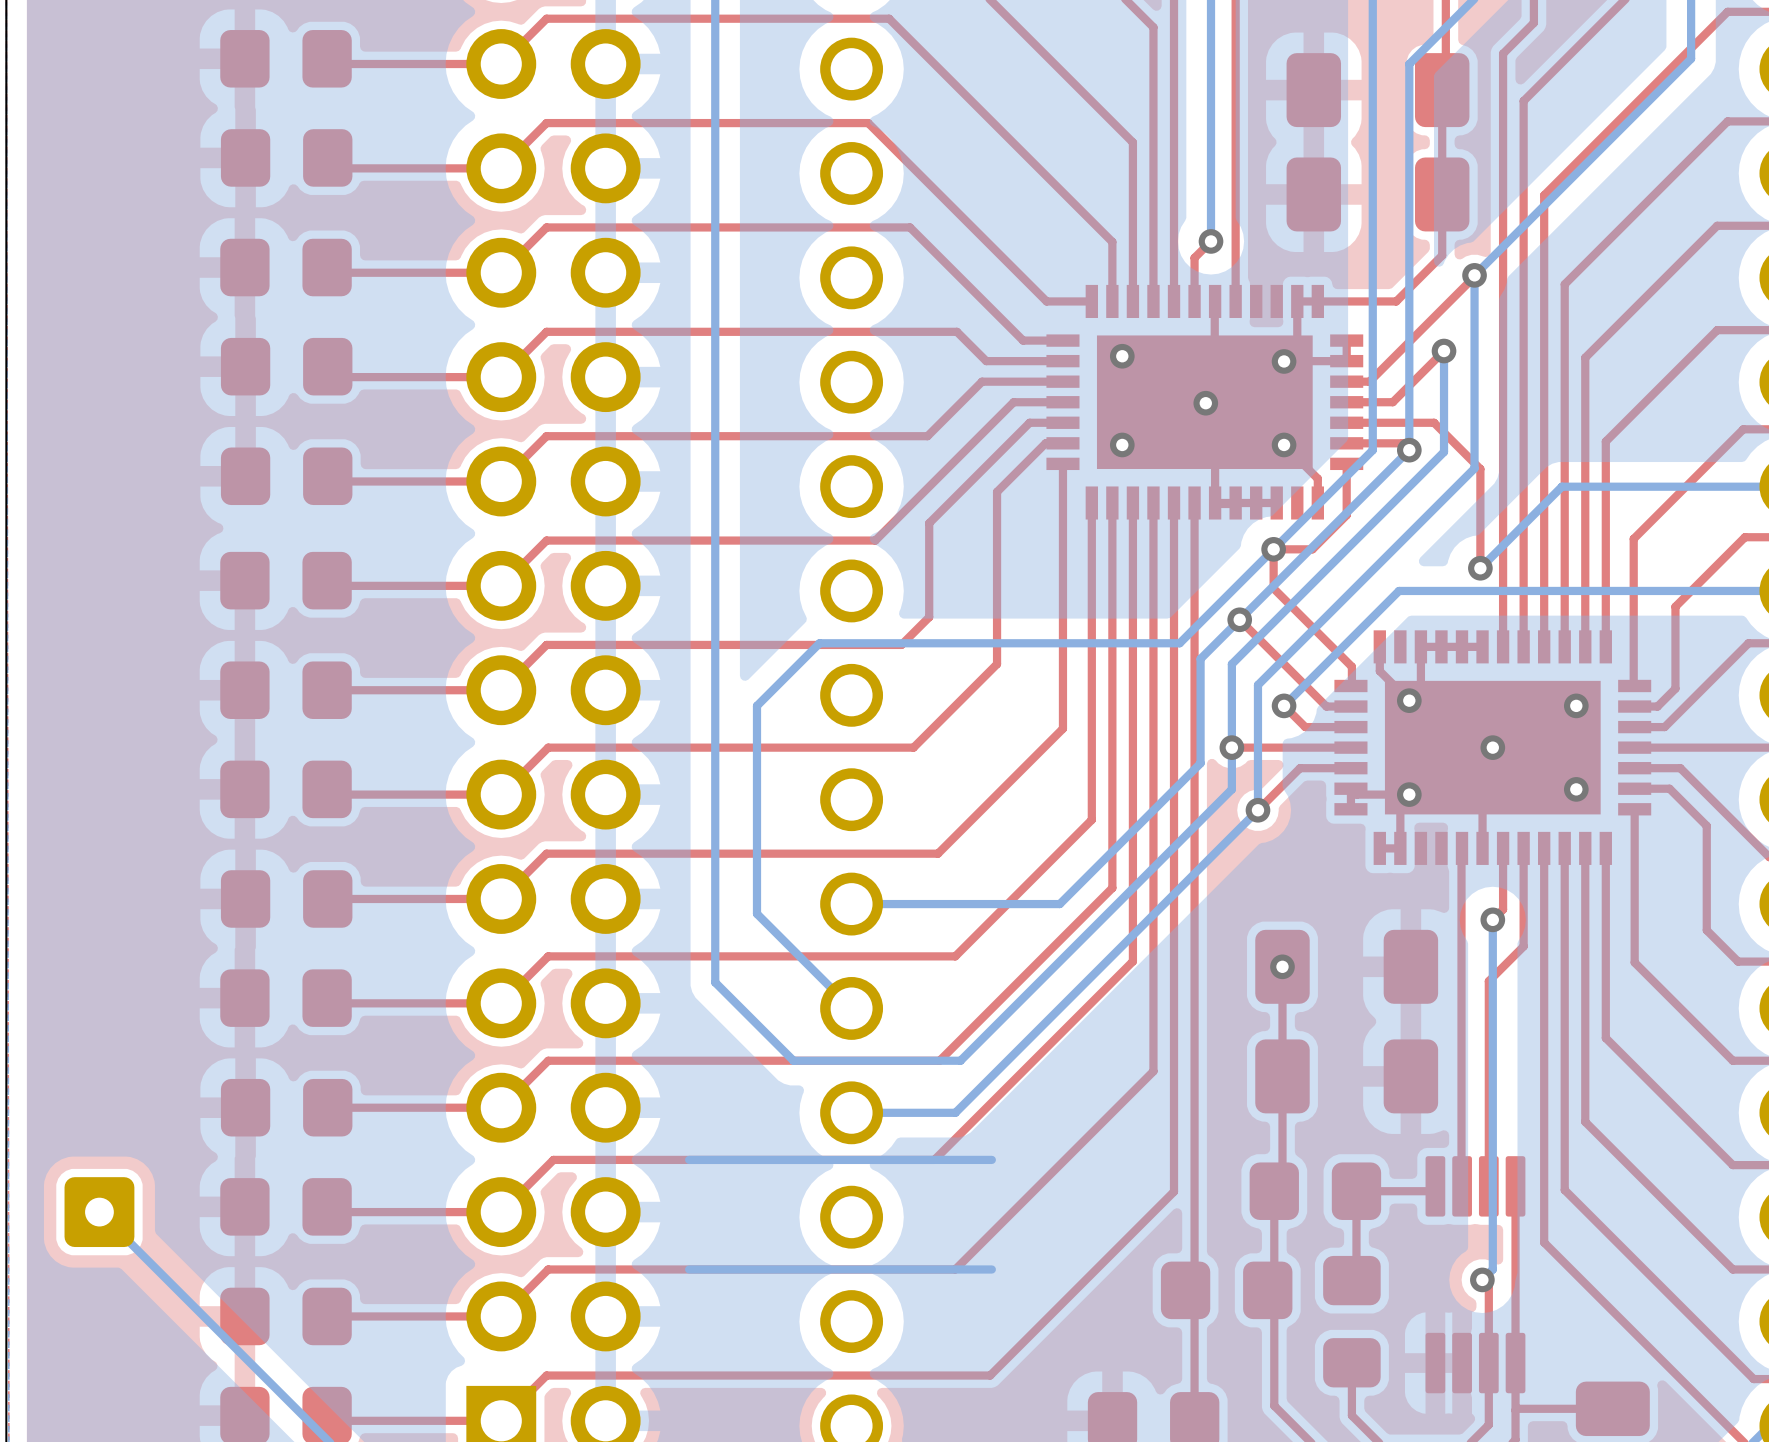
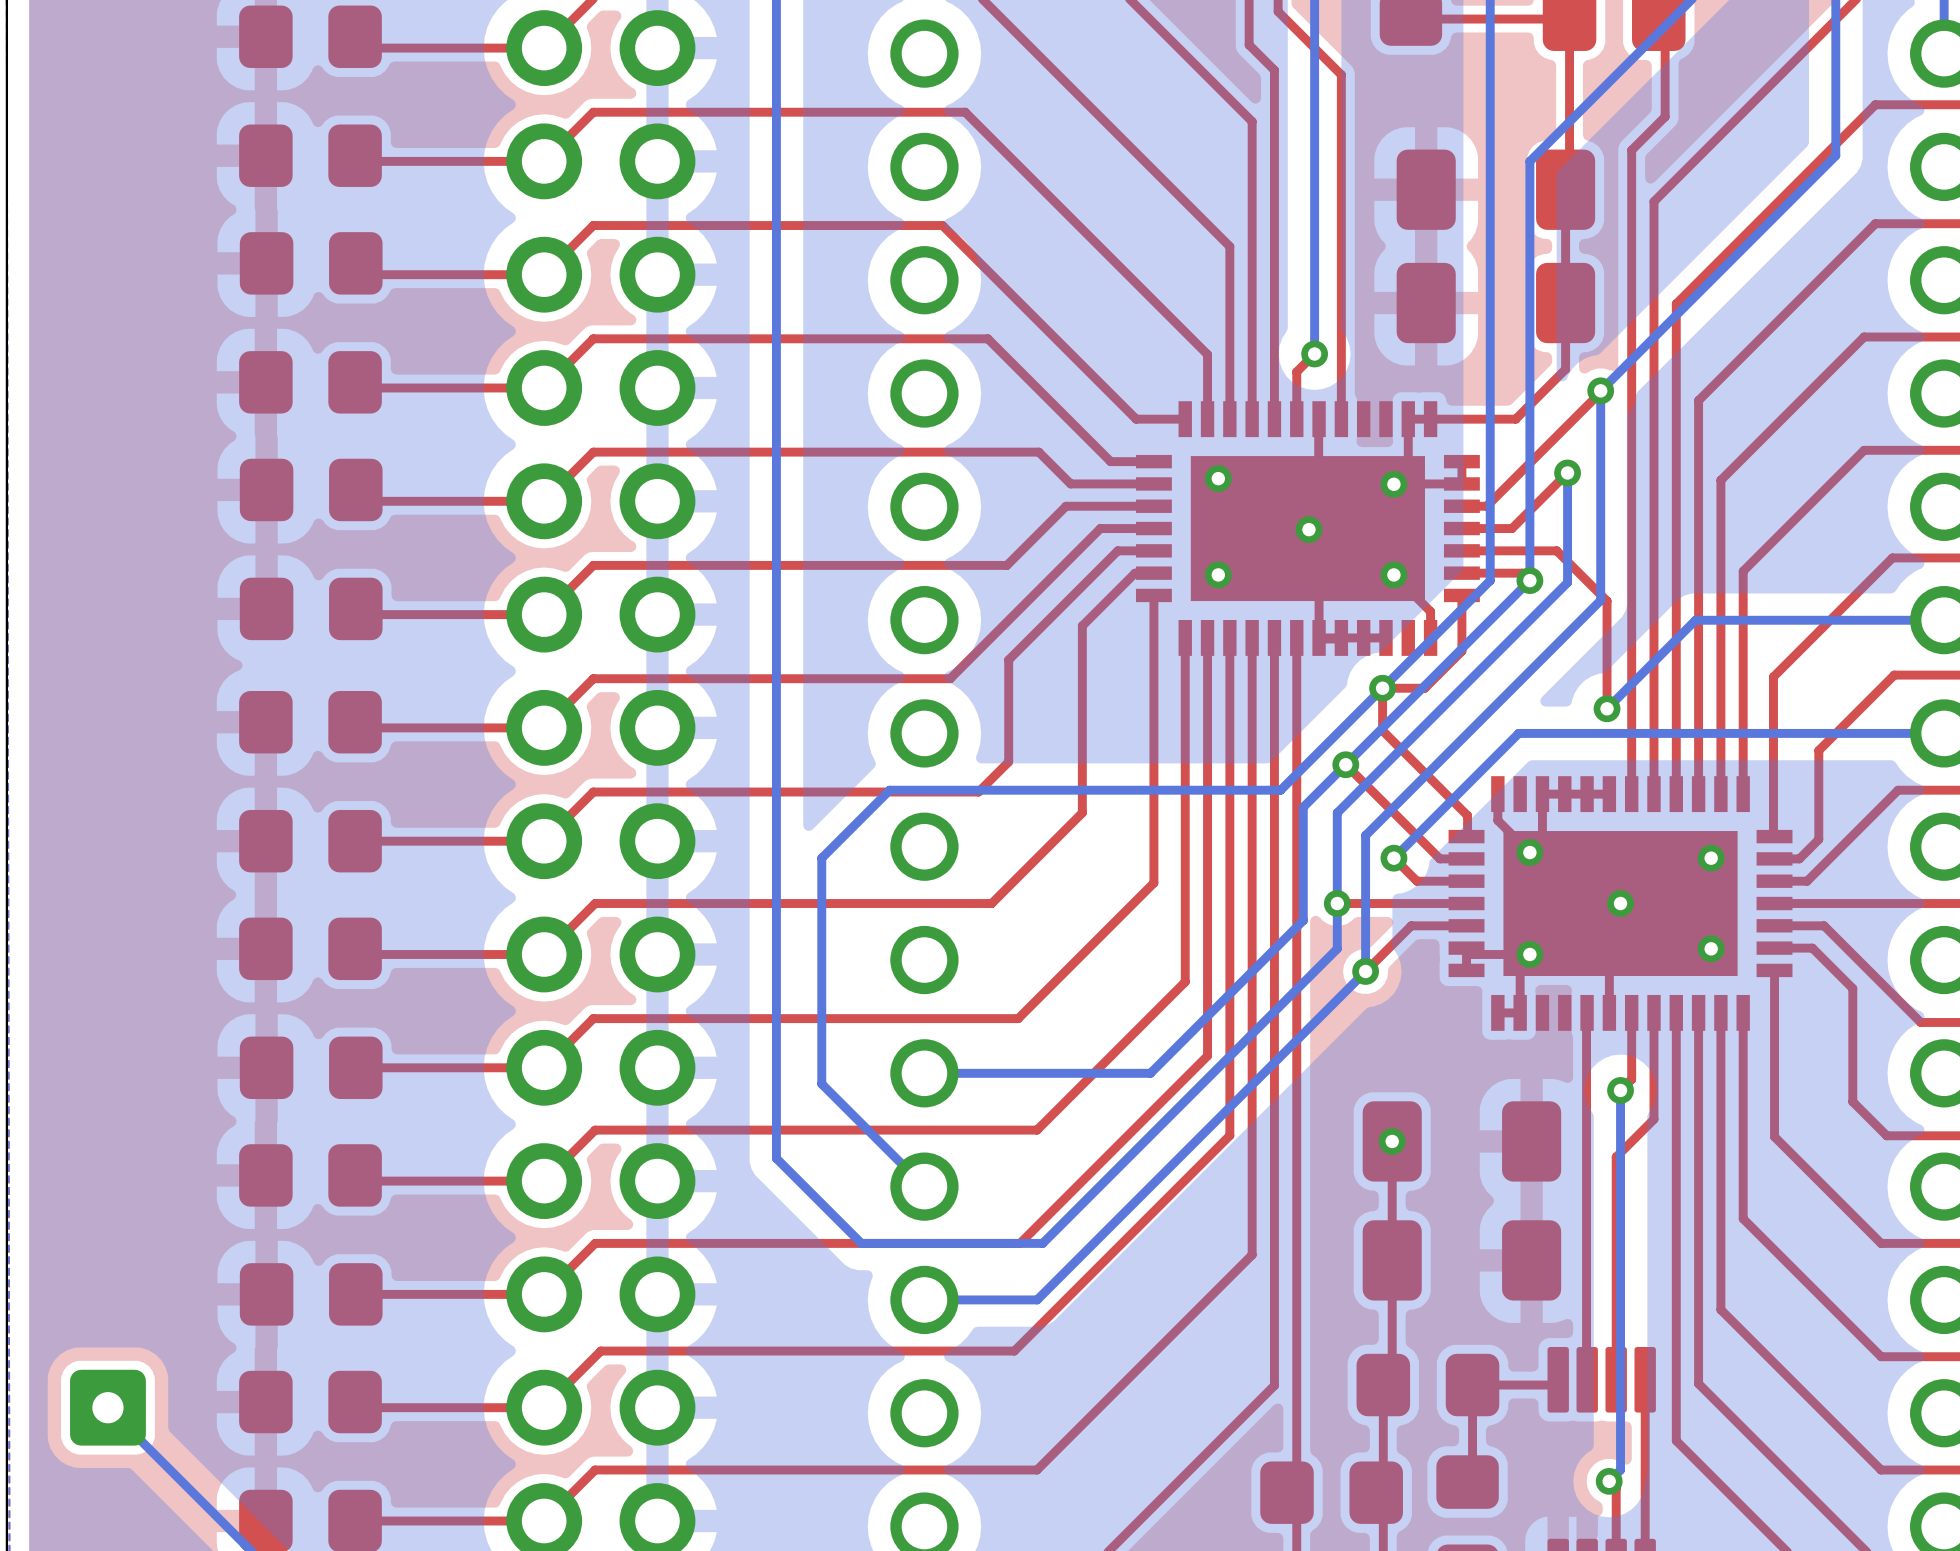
bottom track: (991, 1159) (689, 1159) -> none
bottom track: (991, 1269) (689, 1269) -> none

